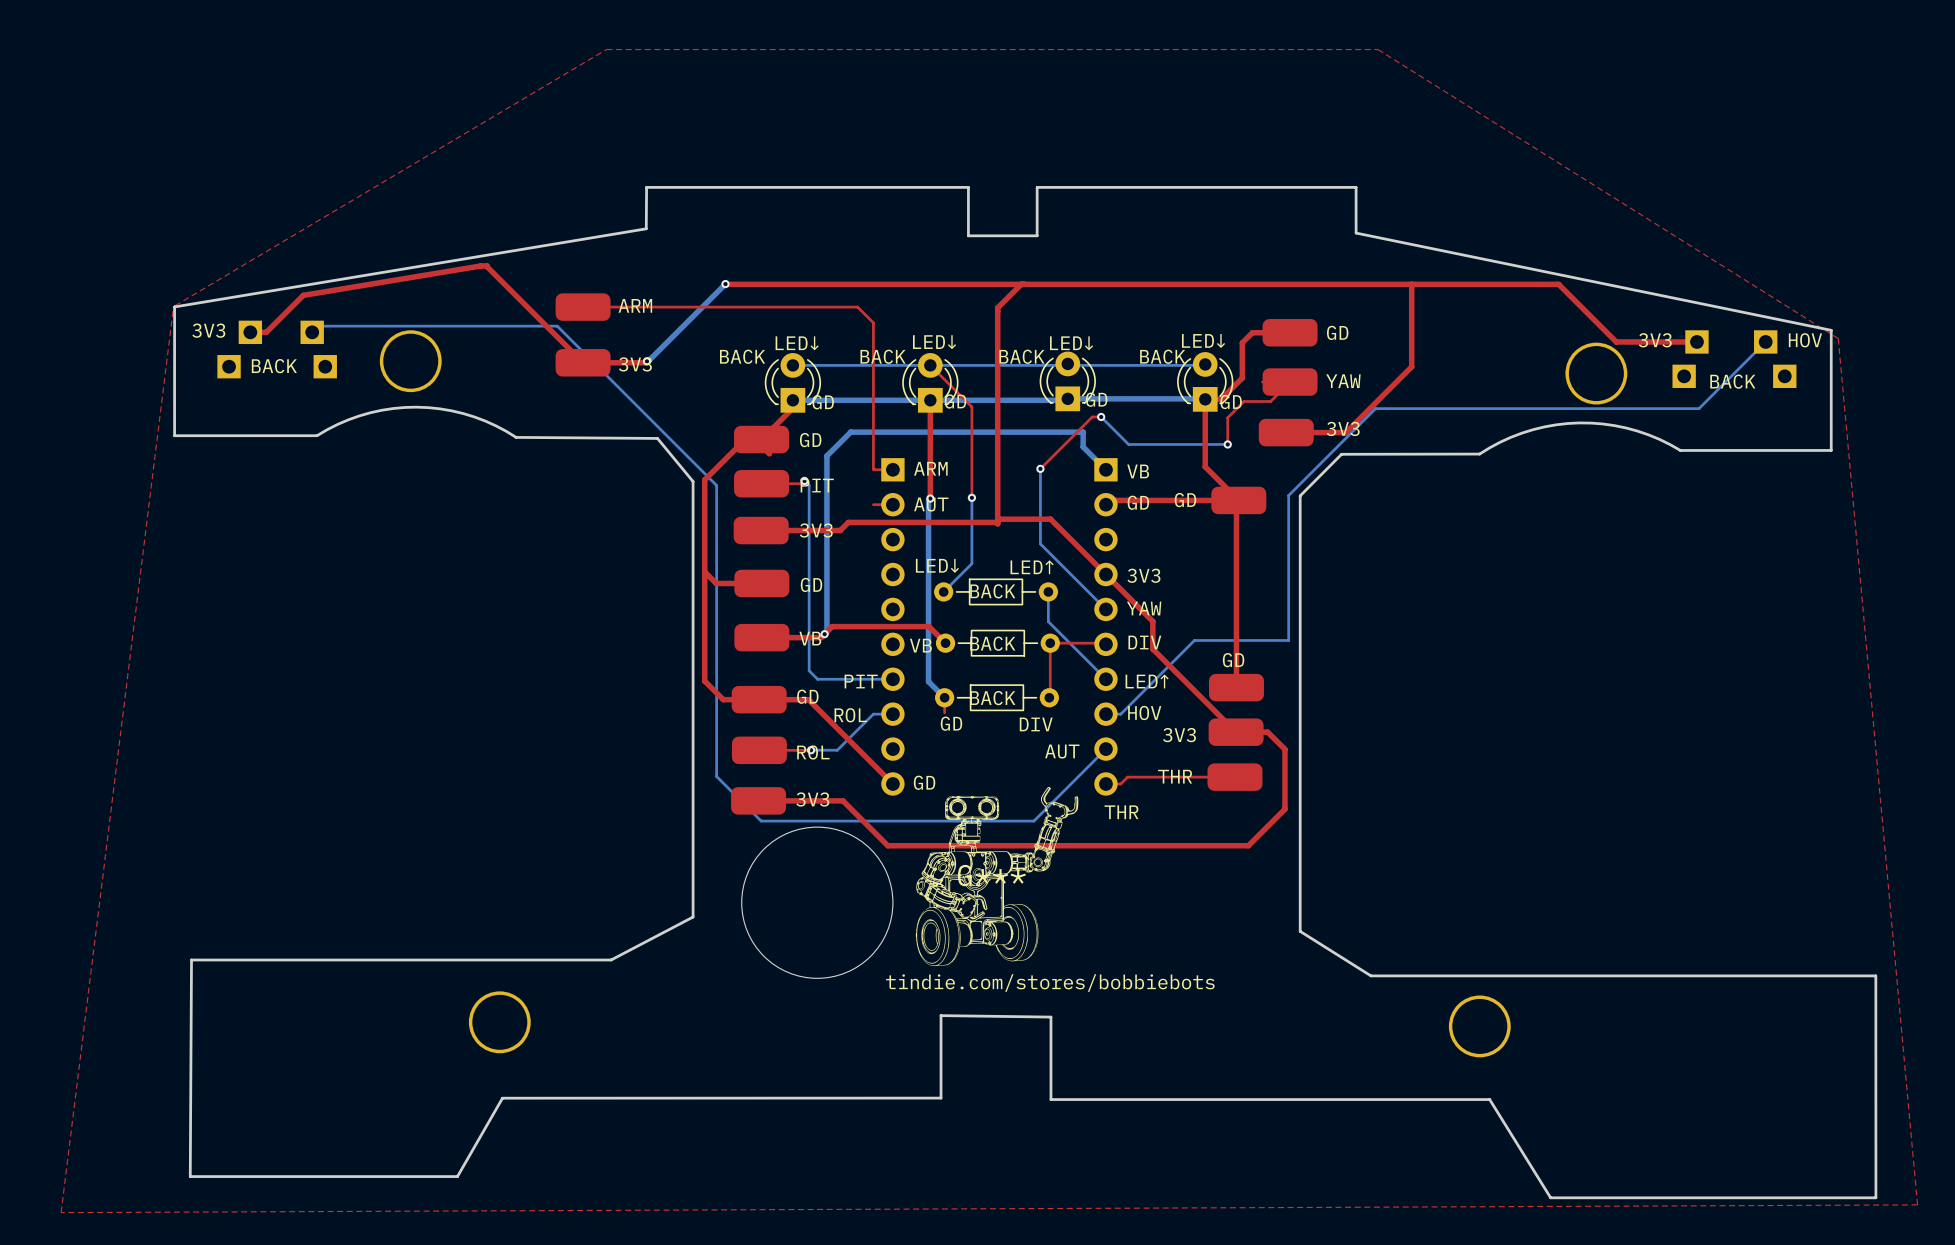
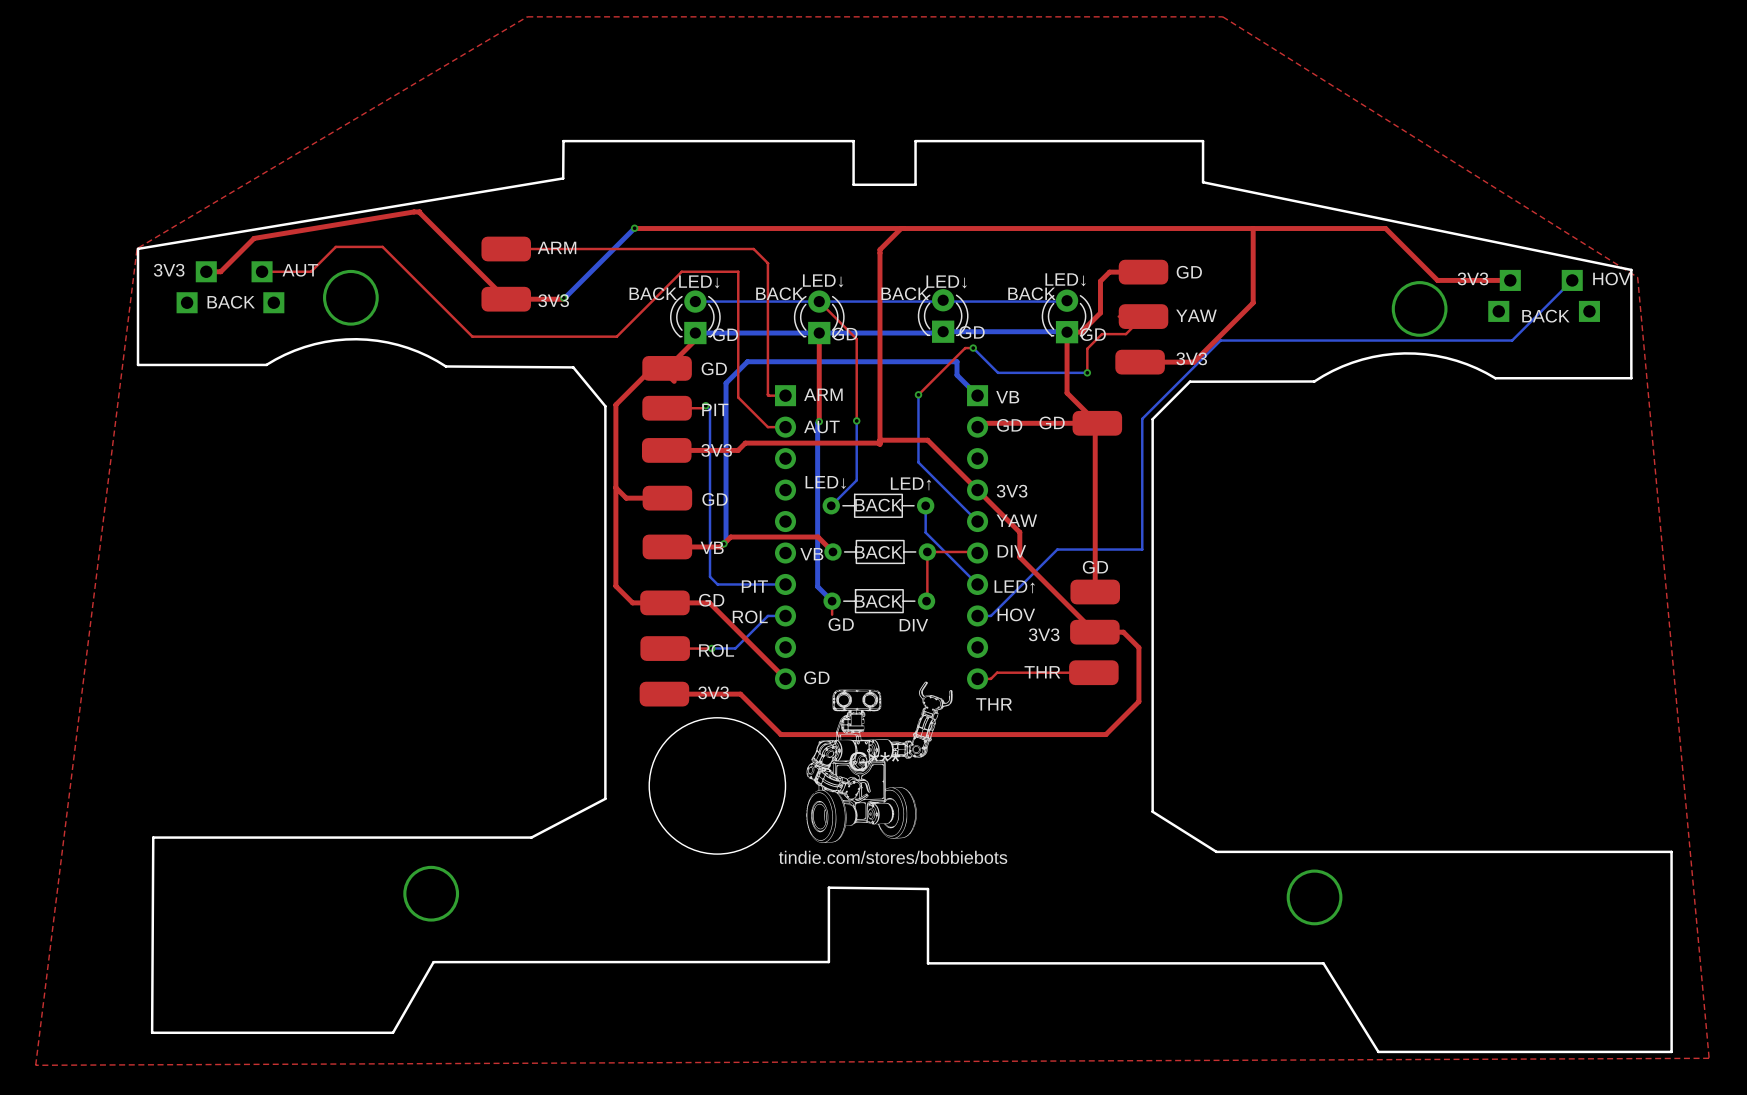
text: none -> AUT (300, 270)
top track: none -> (262, 271) (311, 271) (335, 246) (382, 246) (472, 336) (616, 336) (681, 271) (738, 271) (738, 397) (767, 427)
bottom track: (312, 332) (318, 326) (557, 326) (716, 485) (716, 776) (761, 821) (1033, 821) (1105, 749) -> none
text: AUT (1062, 751) -> none

